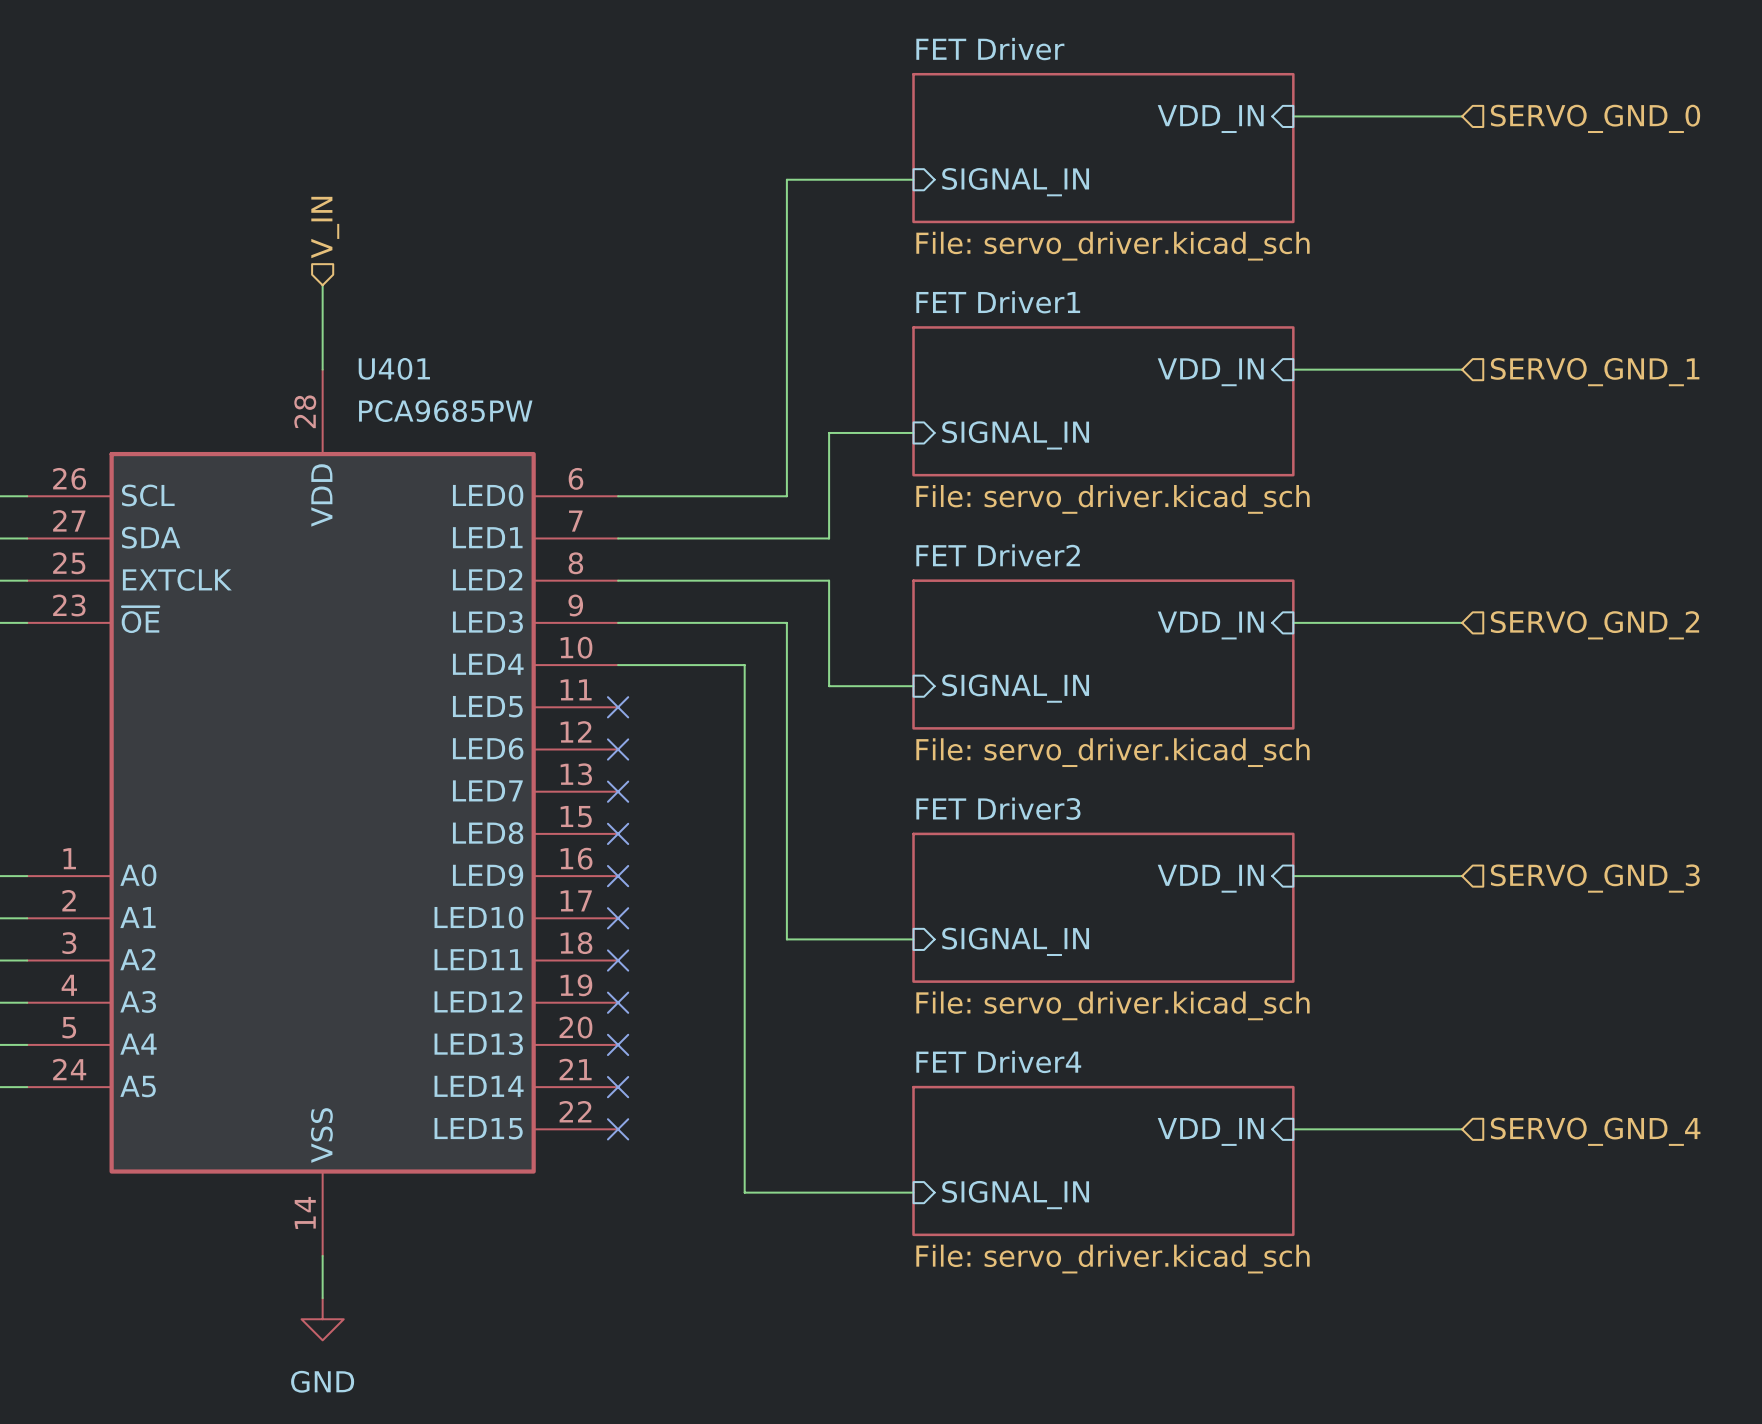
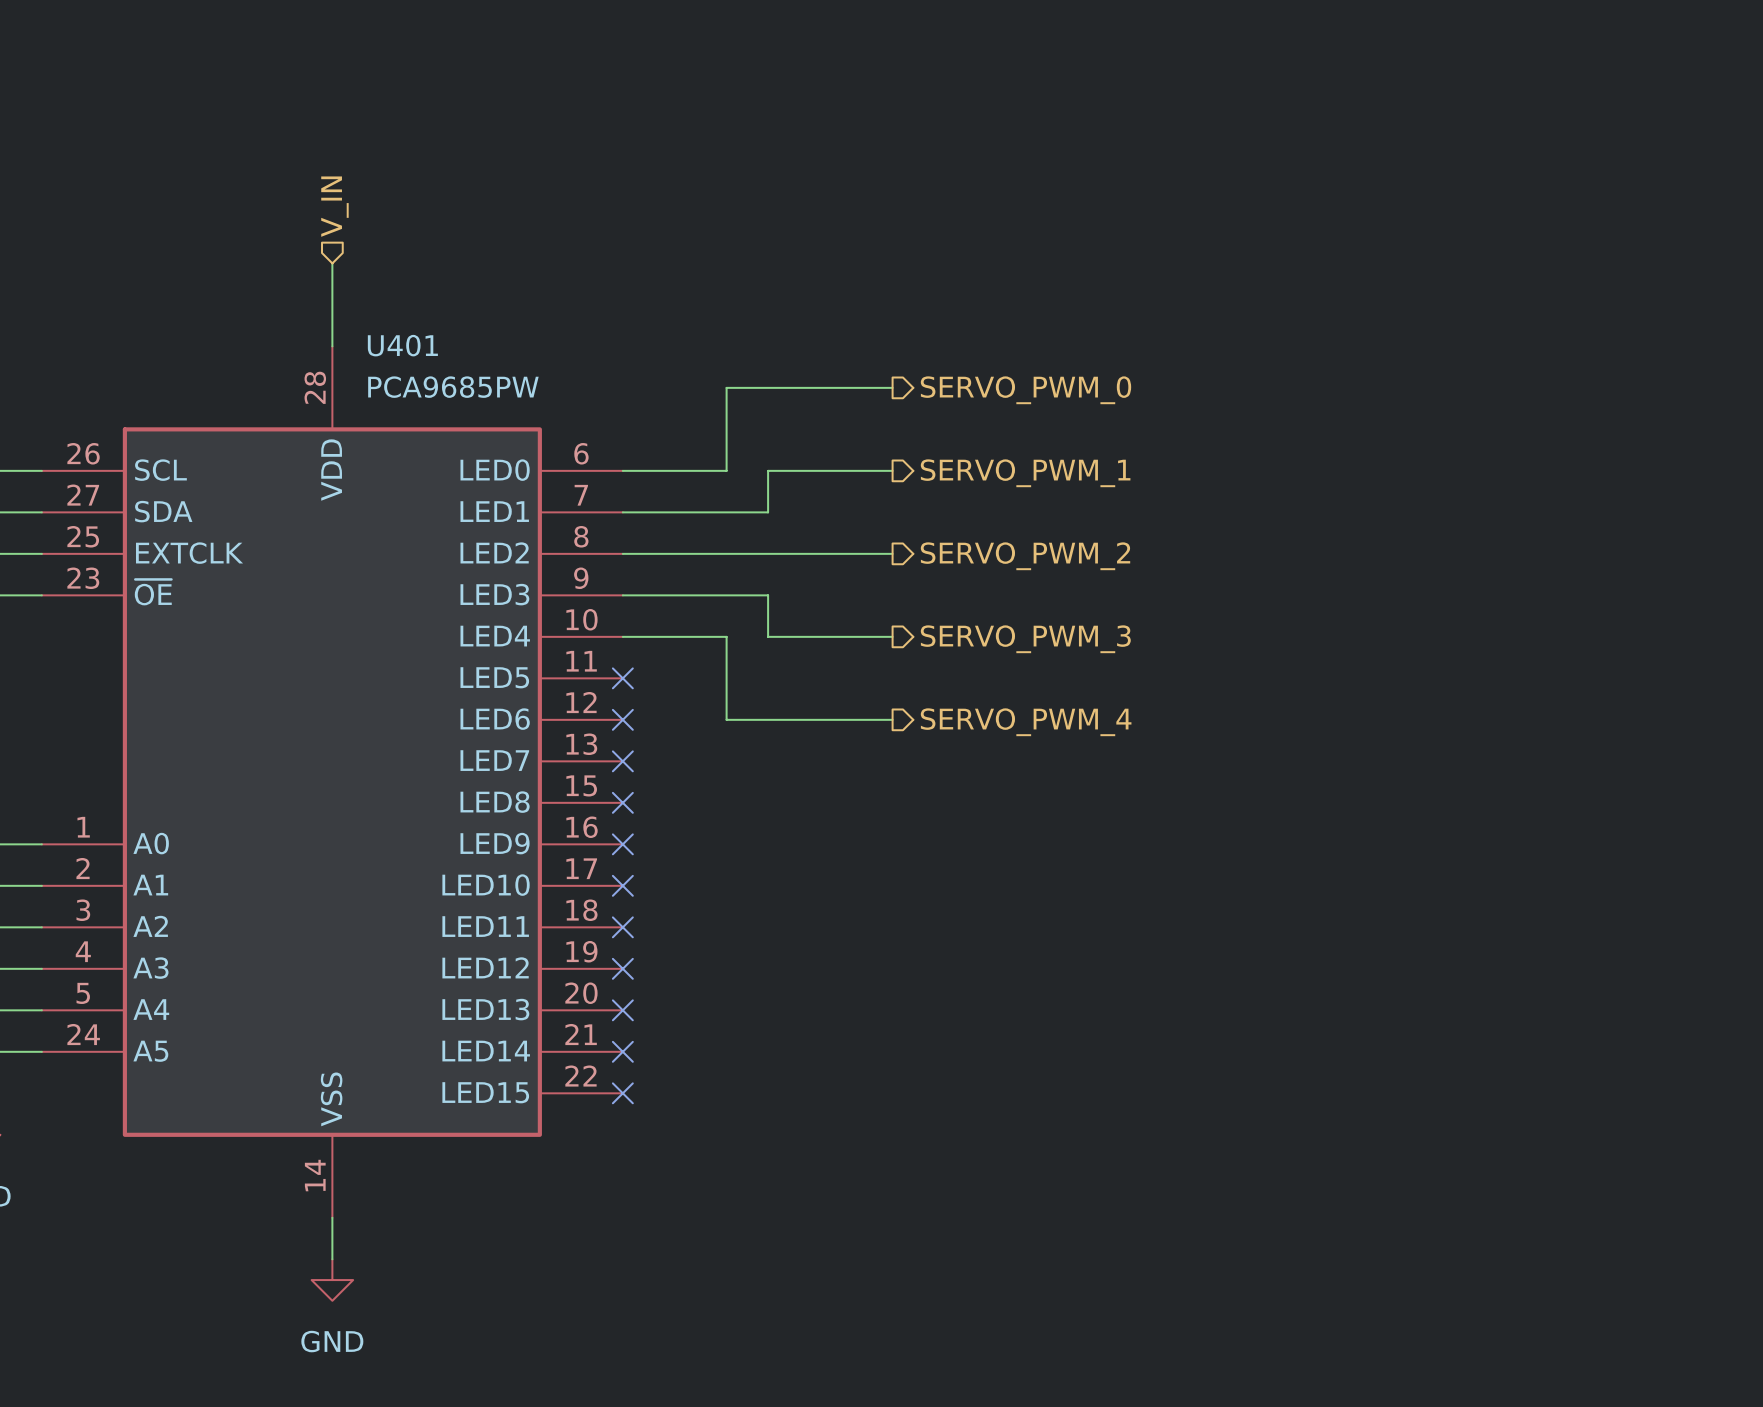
wire: (1293, 116) (1462, 116) -> none
hierarchical label: SERVO_GND_0 (1595, 118) -> none
sheet pin: VDD_IN (1210, 119) -> none
sheet FET Driver: File: servo_driver.kicad_sch (1103, 148) -> none
wire: (913, 179) (786, 179) (786, 496) -> (892, 470) (788, 470)
sheet pin: SIGNAL_IN (1015, 182) -> none
wire: (1293, 369) (1462, 369) -> none
sheet pin: VDD_IN (1210, 372) -> none
hierarchical label: SERVO_GND_1 (1595, 372) -> none
sheet FET Driver1: File: servo_driver.kicad_sch (1103, 401) -> none
wire: none -> (892, 387) (726, 387) (726, 470)
hierarchical label: none -> SERVO_PWM_0 (1025, 390)
wire: (913, 432) (829, 432) (829, 538) (765, 538) -> none
sheet pin: SIGNAL_IN (1015, 435) -> none
wire: (723, 496) (765, 496) -> (768, 512) (768, 470)
hierarchical label: none -> SERVO_PWM_1 (1025, 473)
wire: (829, 580) (829, 686) (913, 686) -> (830, 553) (892, 553)
hierarchical label: none -> SERVO_PWM_2 (1025, 556)
wire: (765, 622) (786, 622) (786, 939) (913, 939) -> (768, 595) (768, 636) (892, 636)
wire: (1293, 622) (1462, 622) -> none
sheet pin: VDD_IN (1210, 625) -> none
hierarchical label: SERVO_GND_2 (1595, 625) -> none
sheet FET Driver2: File: servo_driver.kicad_sch (1103, 654) -> none
wire: (723, 665) (744, 665) (744, 1192) (913, 1192) -> (726, 636) (726, 719) (892, 719)
hierarchical label: none -> SERVO_PWM_3 (1025, 639)
sheet pin: SIGNAL_IN (1015, 688) -> none
hierarchical label: none -> SERVO_PWM_4 (1026, 722)
wire: (1293, 876) (1462, 876) -> none
sheet pin: VDD_IN (1210, 878) -> none
hierarchical label: SERVO_GND_3 (1595, 878) -> none
sheet FET Driver3: File: servo_driver.kicad_sch (1103, 907) -> none
sheet pin: SIGNAL_IN (1015, 941) -> none
wire: (1293, 1129) (1462, 1129) -> none
sheet pin: VDD_IN (1210, 1131) -> none
hierarchical label: SERVO_GND_4 (1595, 1131) -> none
sheet FET Driver4: File: servo_driver.kicad_sch (1103, 1160) -> none
sheet pin: SIGNAL_IN (1015, 1195) -> none

